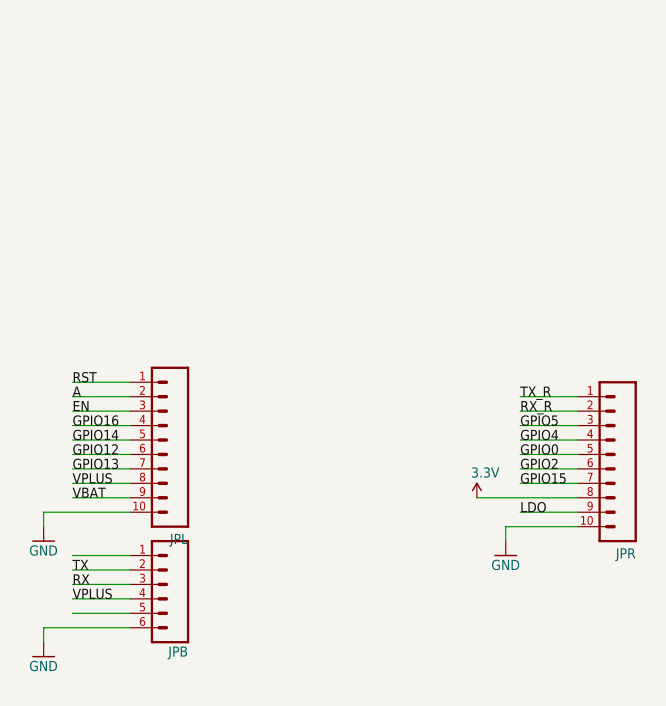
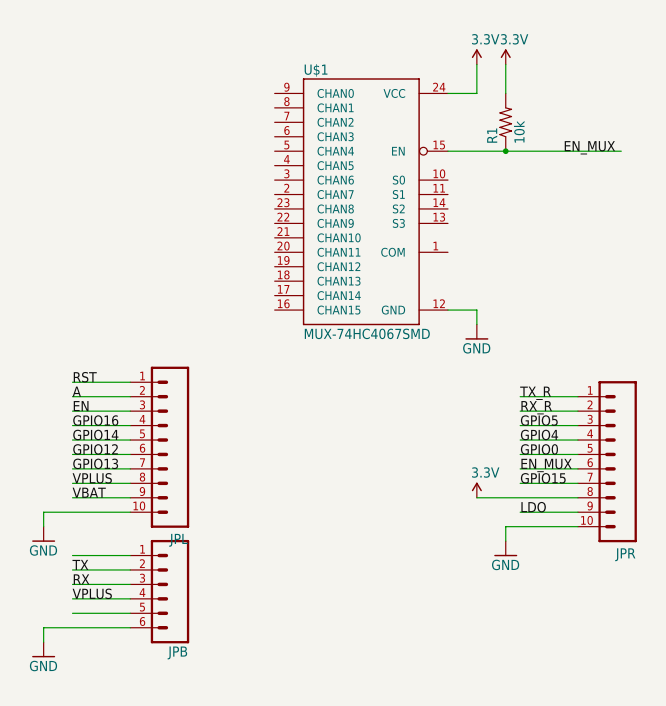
power symbol: none -> 3.3V (476, 56)
power symbol: none -> 3.3V (505, 56)
wire: none -> (476, 64) (476, 93) (447, 93)
wire: none -> (505, 64) (505, 93)
R1: none -> 10k (505, 122)
label: none -> EN_MUX (589, 147)
wire: none -> (447, 151) (621, 151)
junction: none -> (505, 151)
U$1: none -> MUX-74HC4067SMD (361, 201)
wire: none -> (447, 310) (476, 310) (476, 324)
power symbol: none -> GND (476, 332)
label: GPIO2 (539, 463) -> EN_MUX (546, 465)

